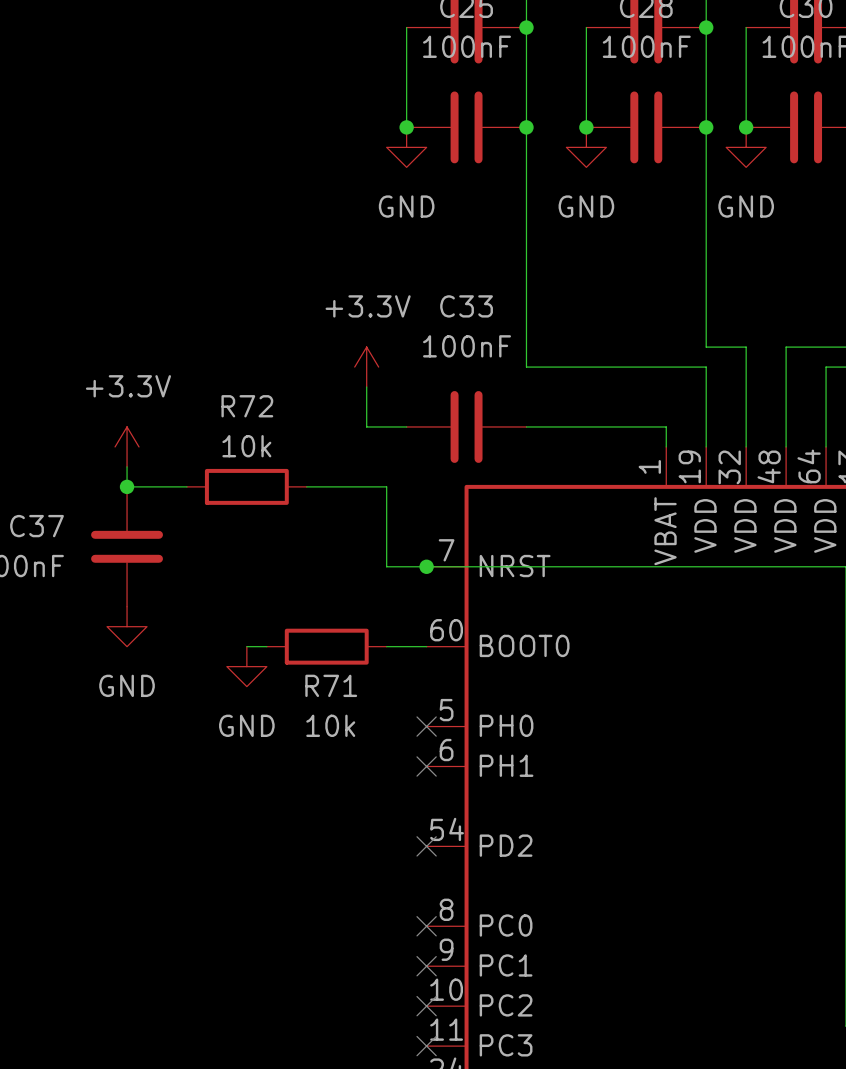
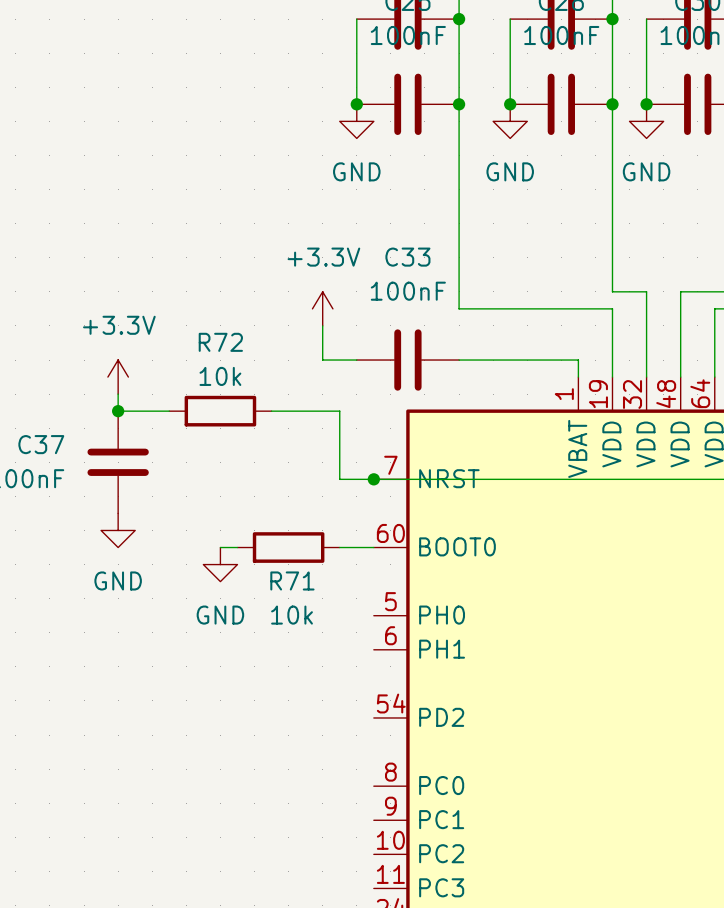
no-connect mark: (426, 726) -> none
no-connect mark: (426, 766) -> none
no-connect mark: (426, 846) -> none
no-connect mark: (426, 926) -> none
no-connect mark: (426, 966) -> none
no-connect mark: (426, 1006) -> none
no-connect mark: (426, 1046) -> none

